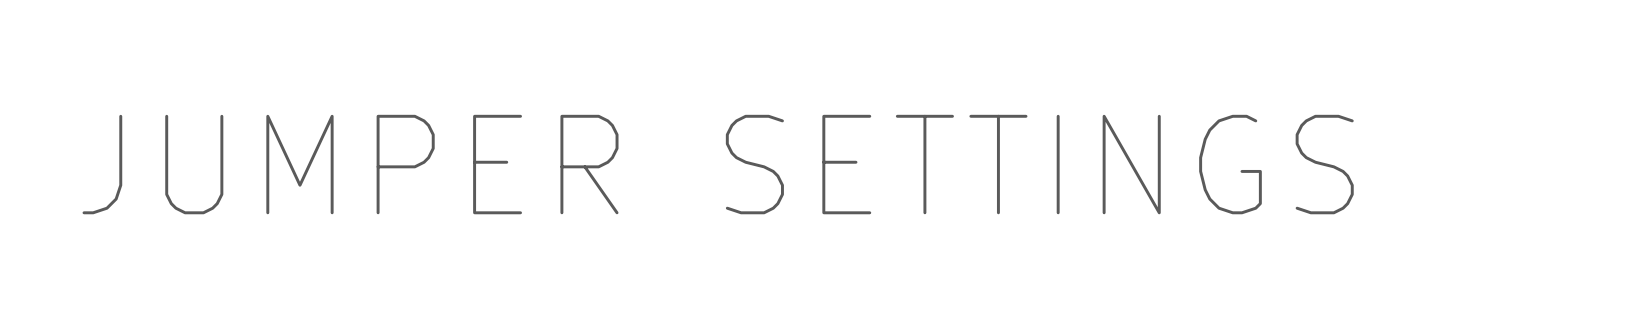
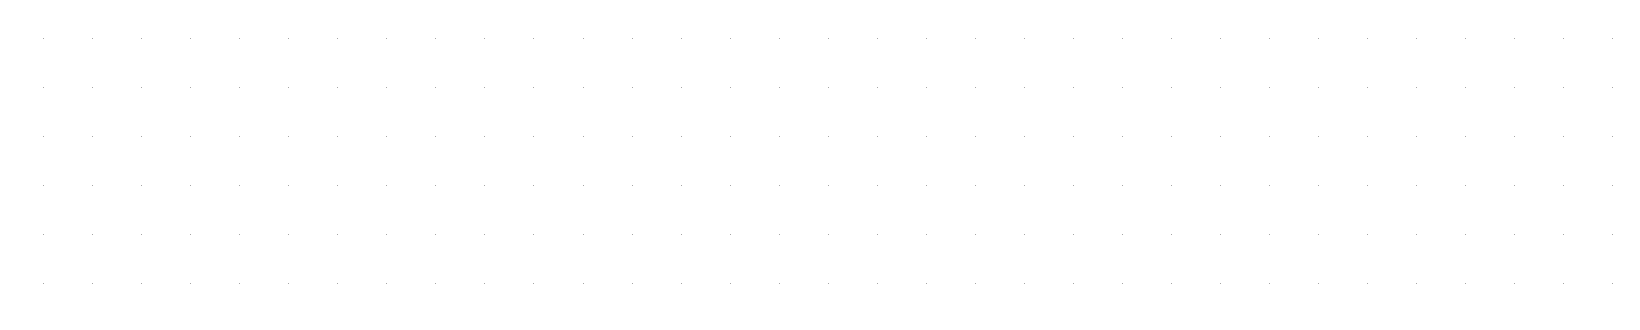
text: JUMPER SETTINGS (718, 164) -> none

